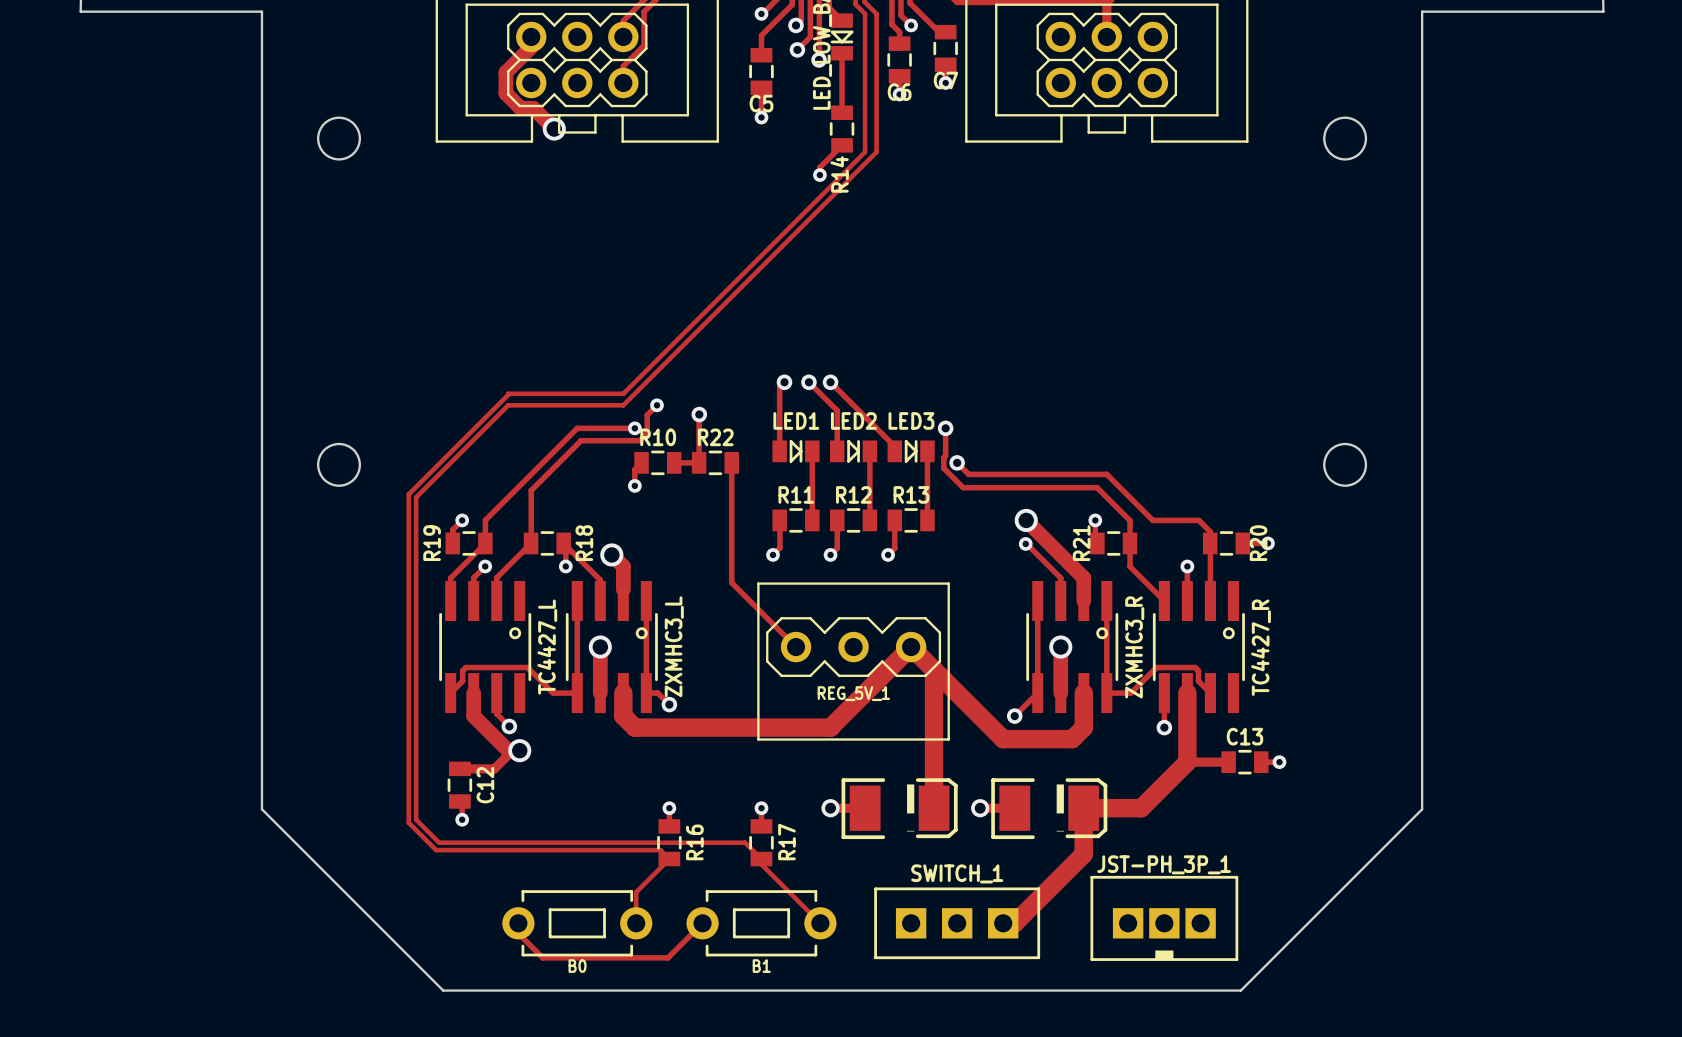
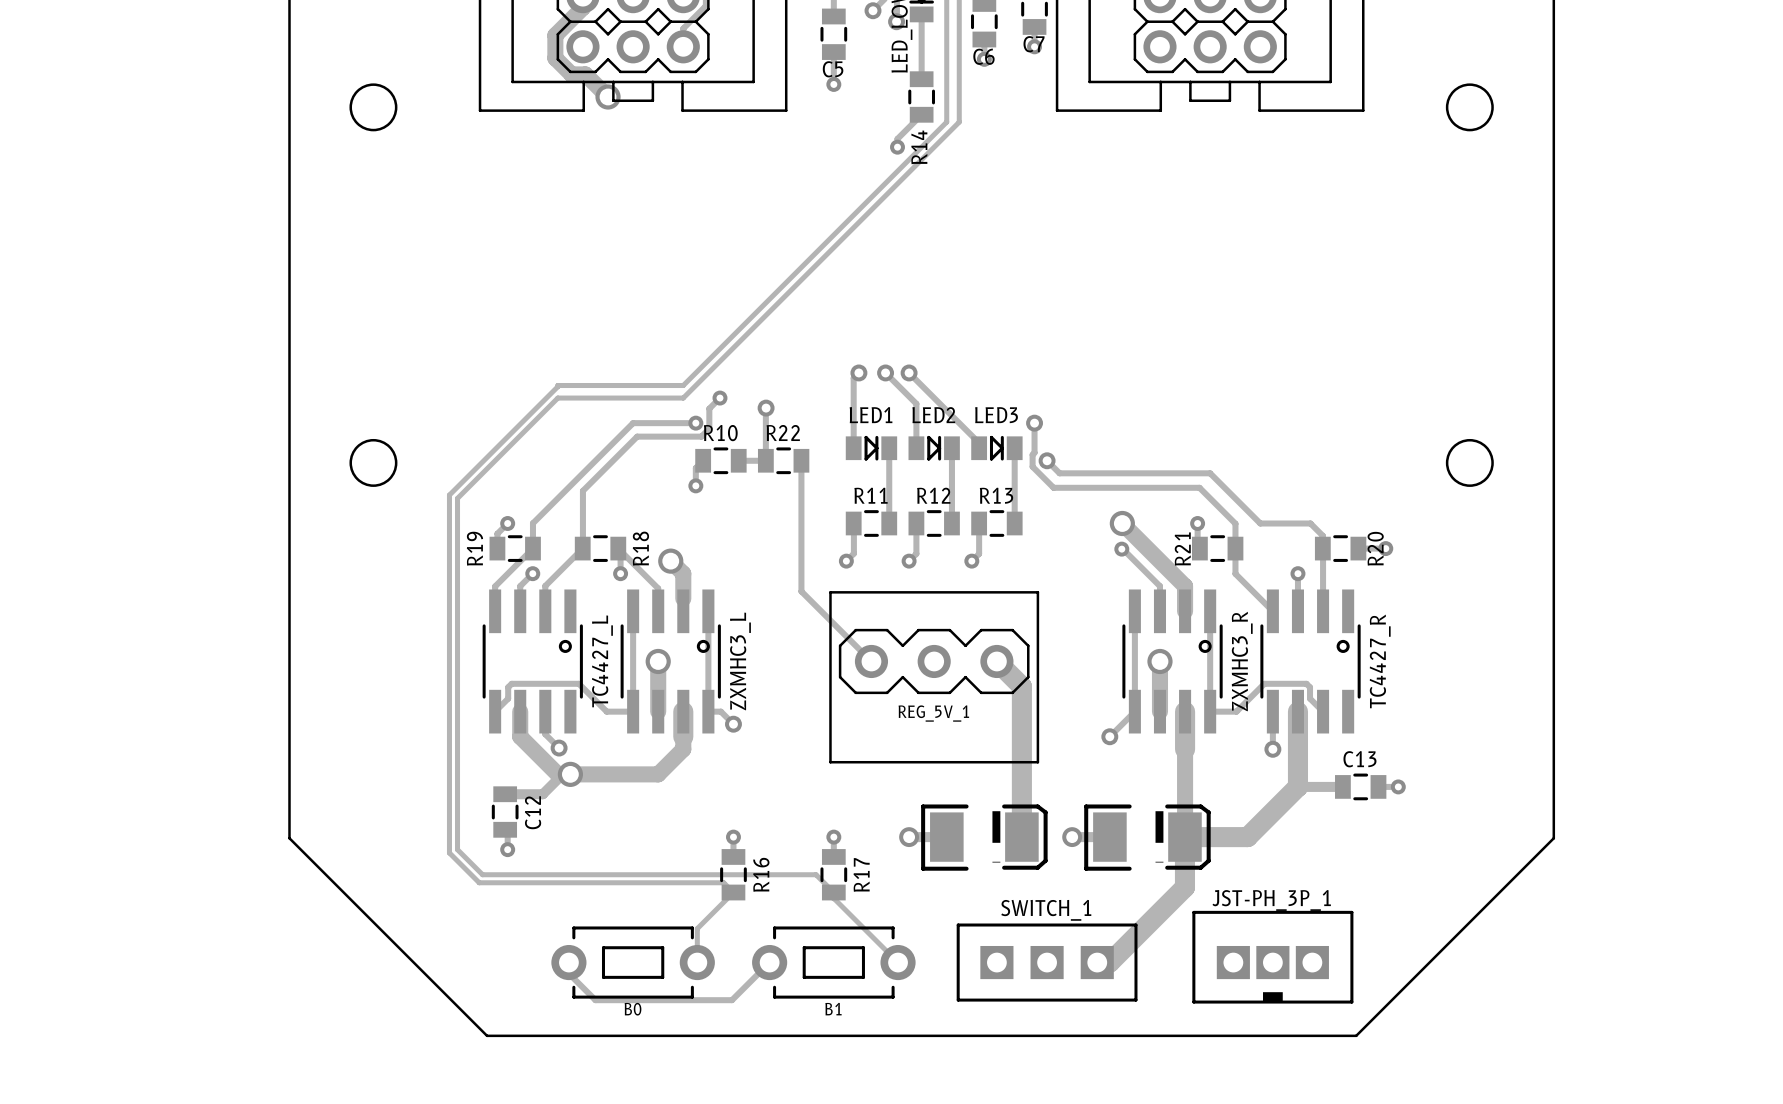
track: (911, 647) (830, 727) (634, 727) (623, 716) -> (570, 774) (658, 774) (683, 749) (683, 736)
track: (934, 669) (1003, 739) (1072, 739) (1083, 727) -> (1185, 837) (1185, 749)

